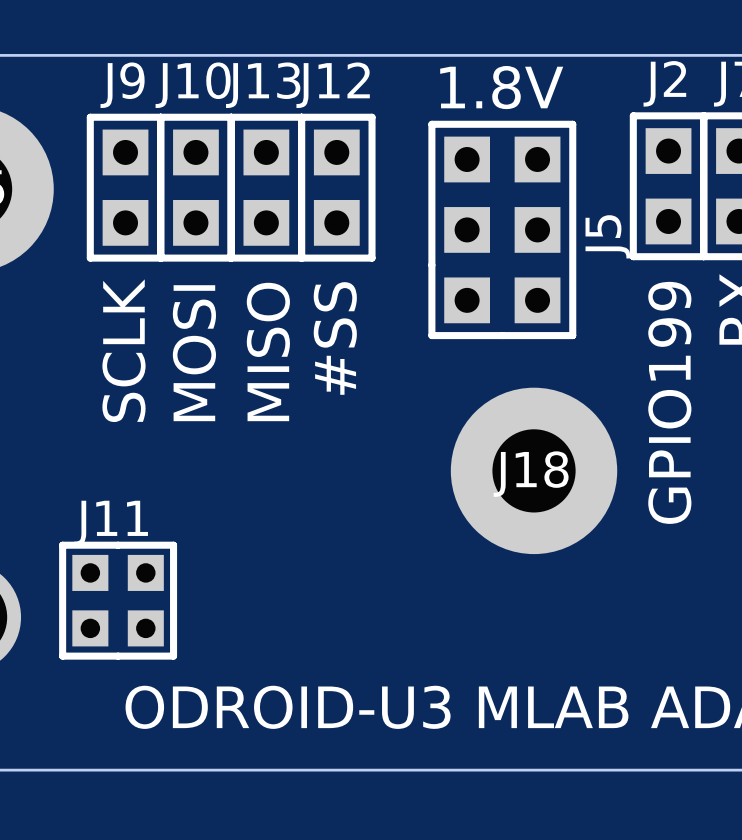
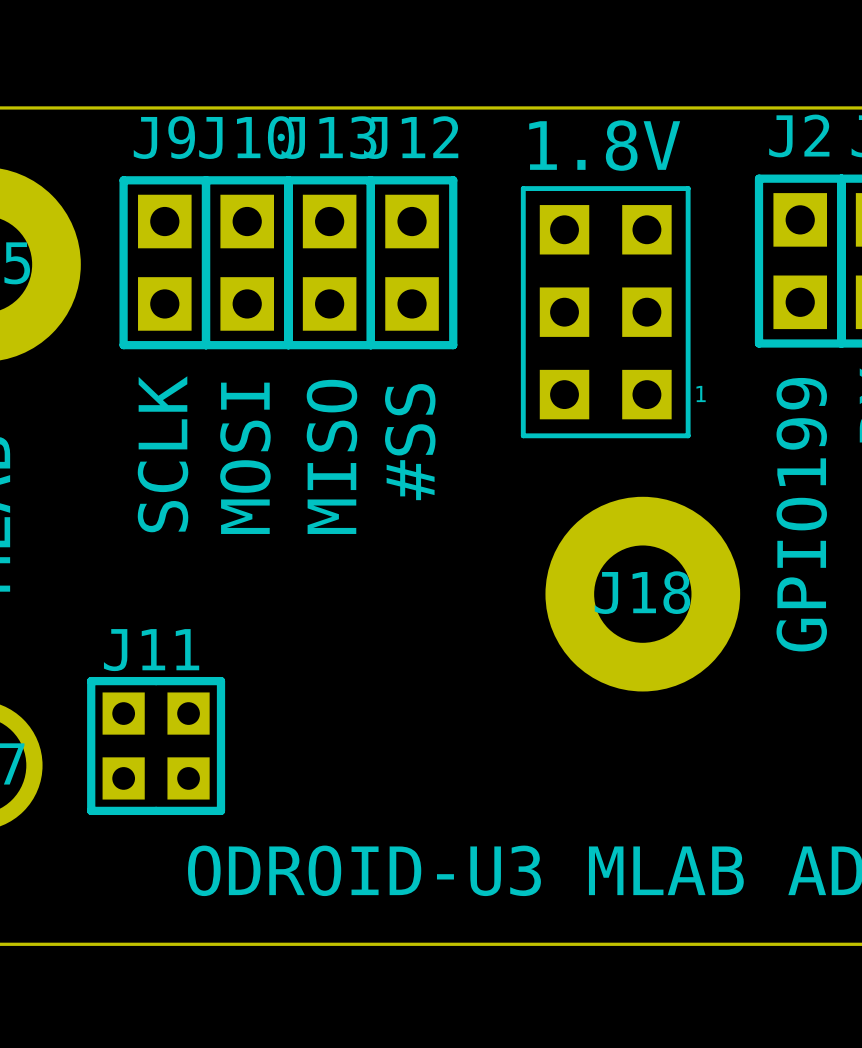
J5: (502, 229) -> none
part: none -> (605, 312)

